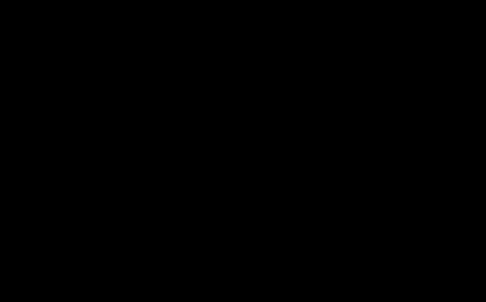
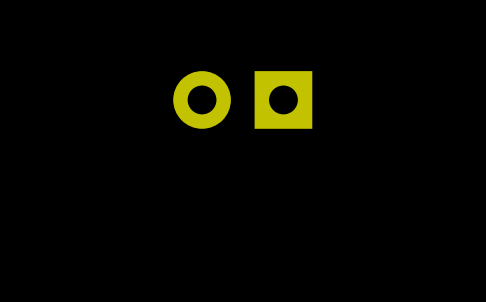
part: none -> (242, 99)

